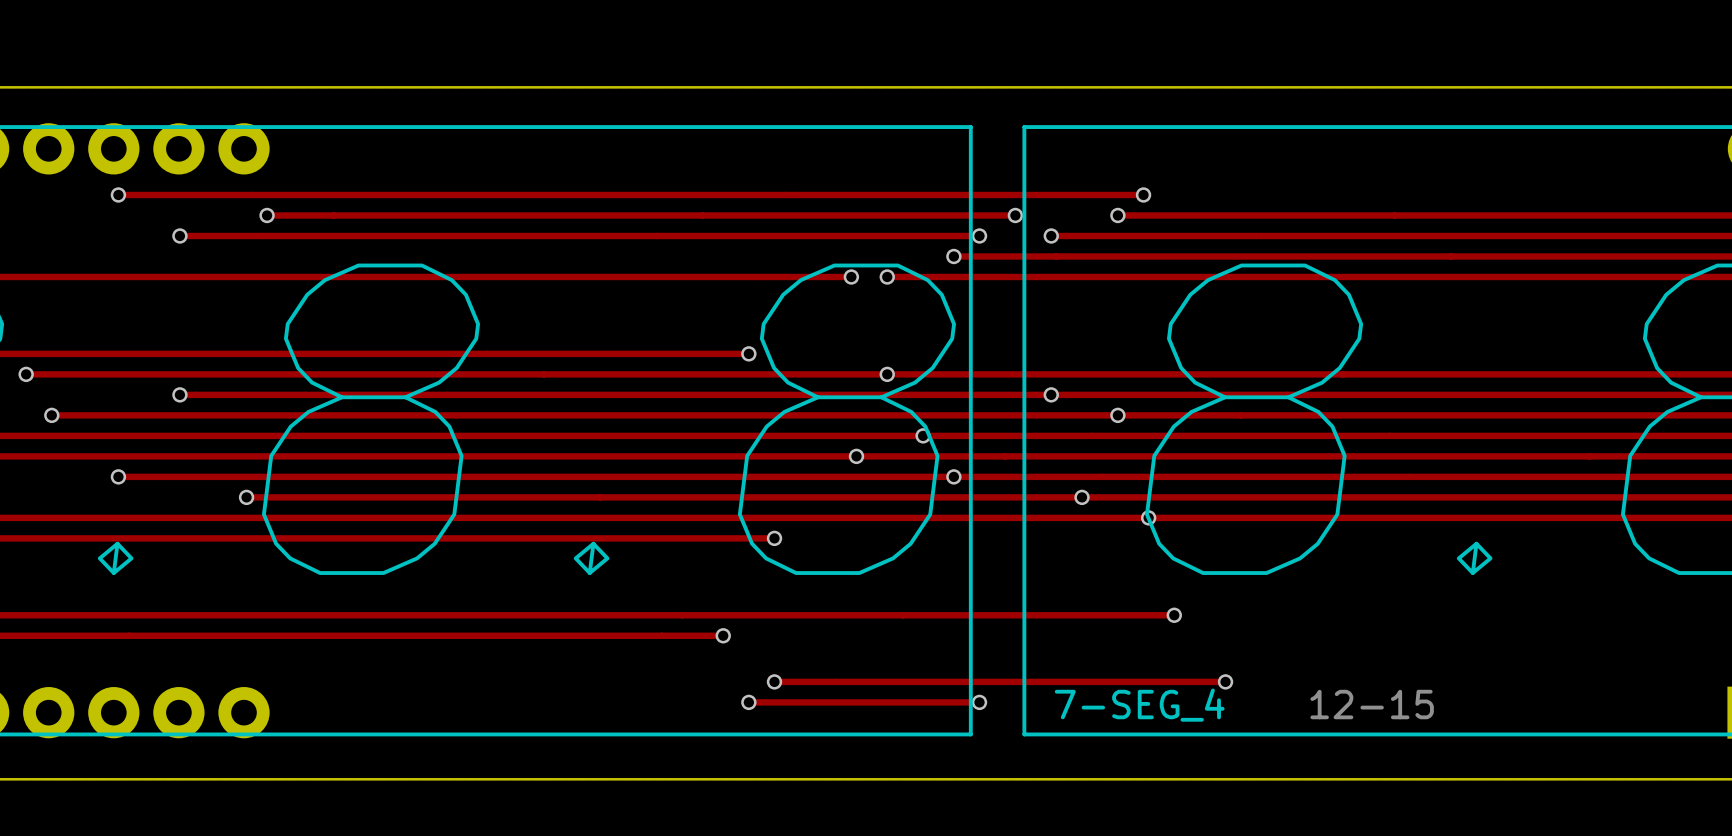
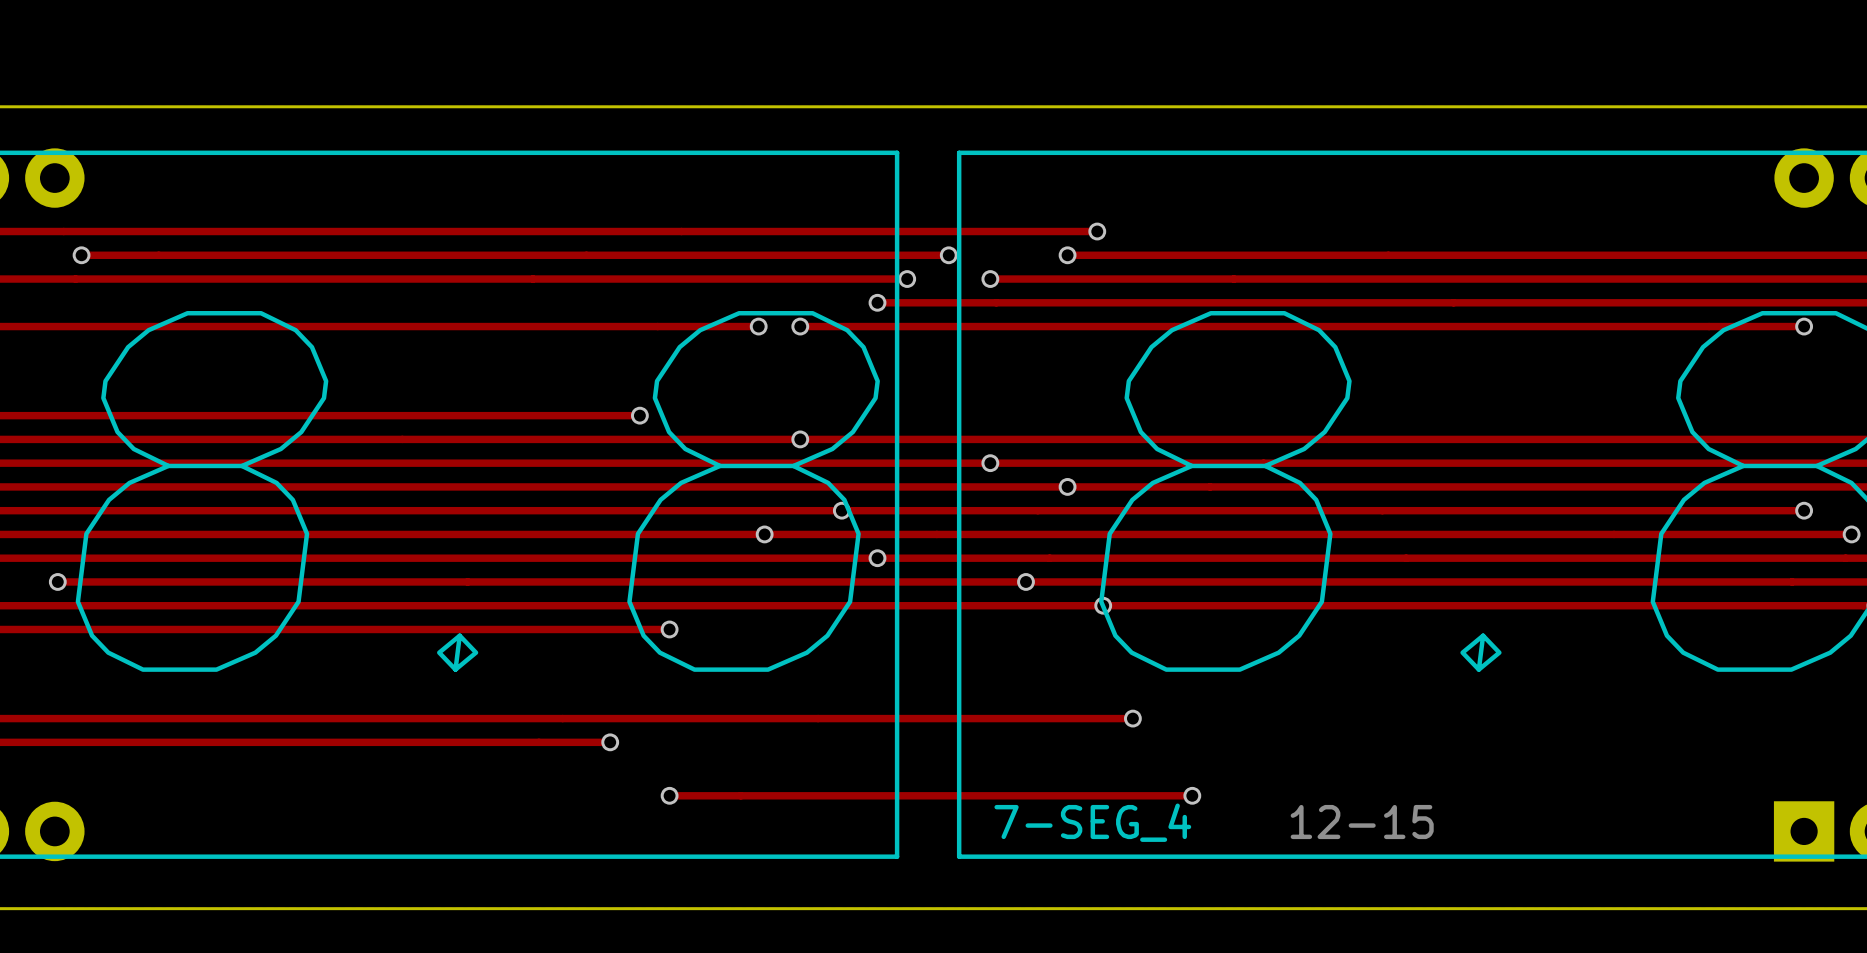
track: (748, 702) (979, 702) -> none
via: (748, 702) -> none
via: (979, 702) -> none

